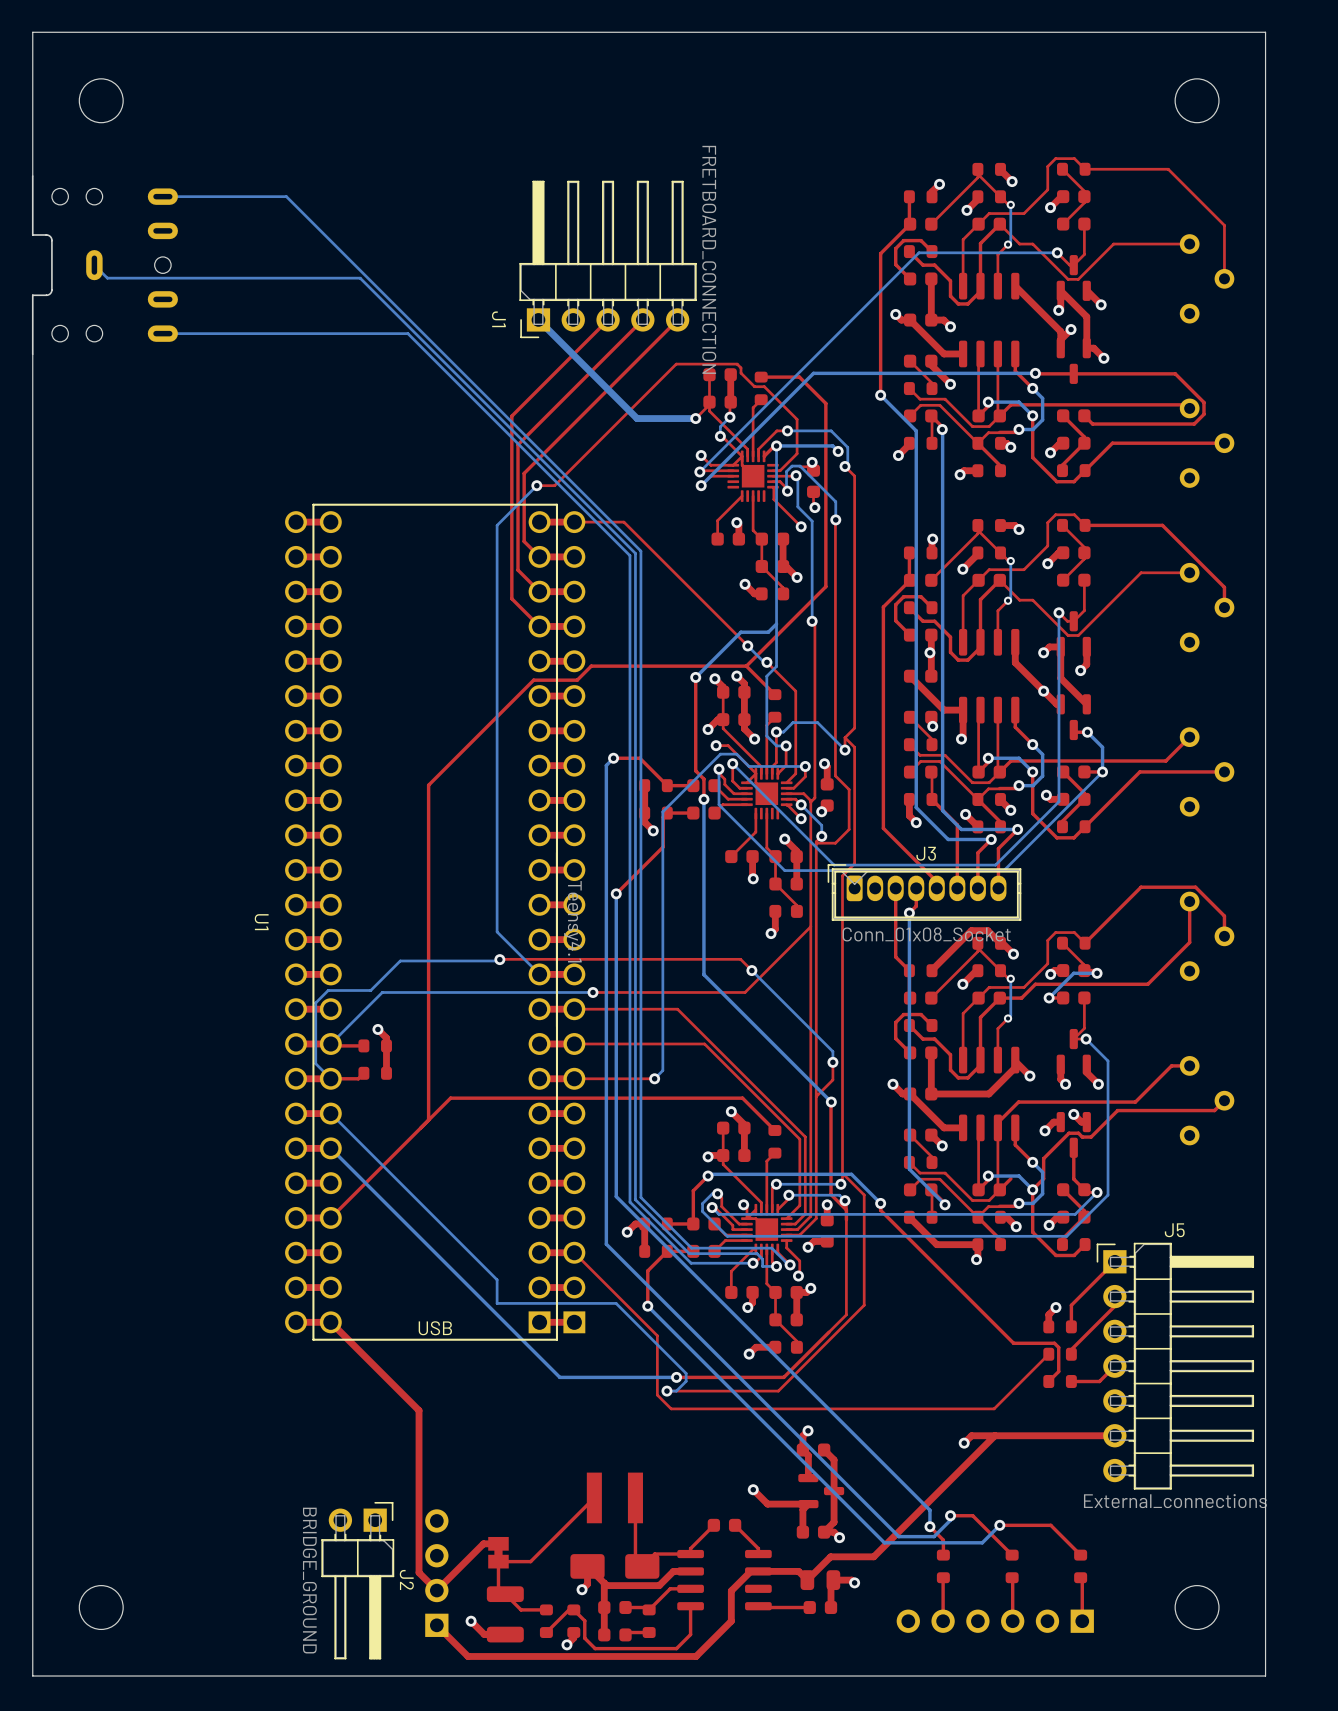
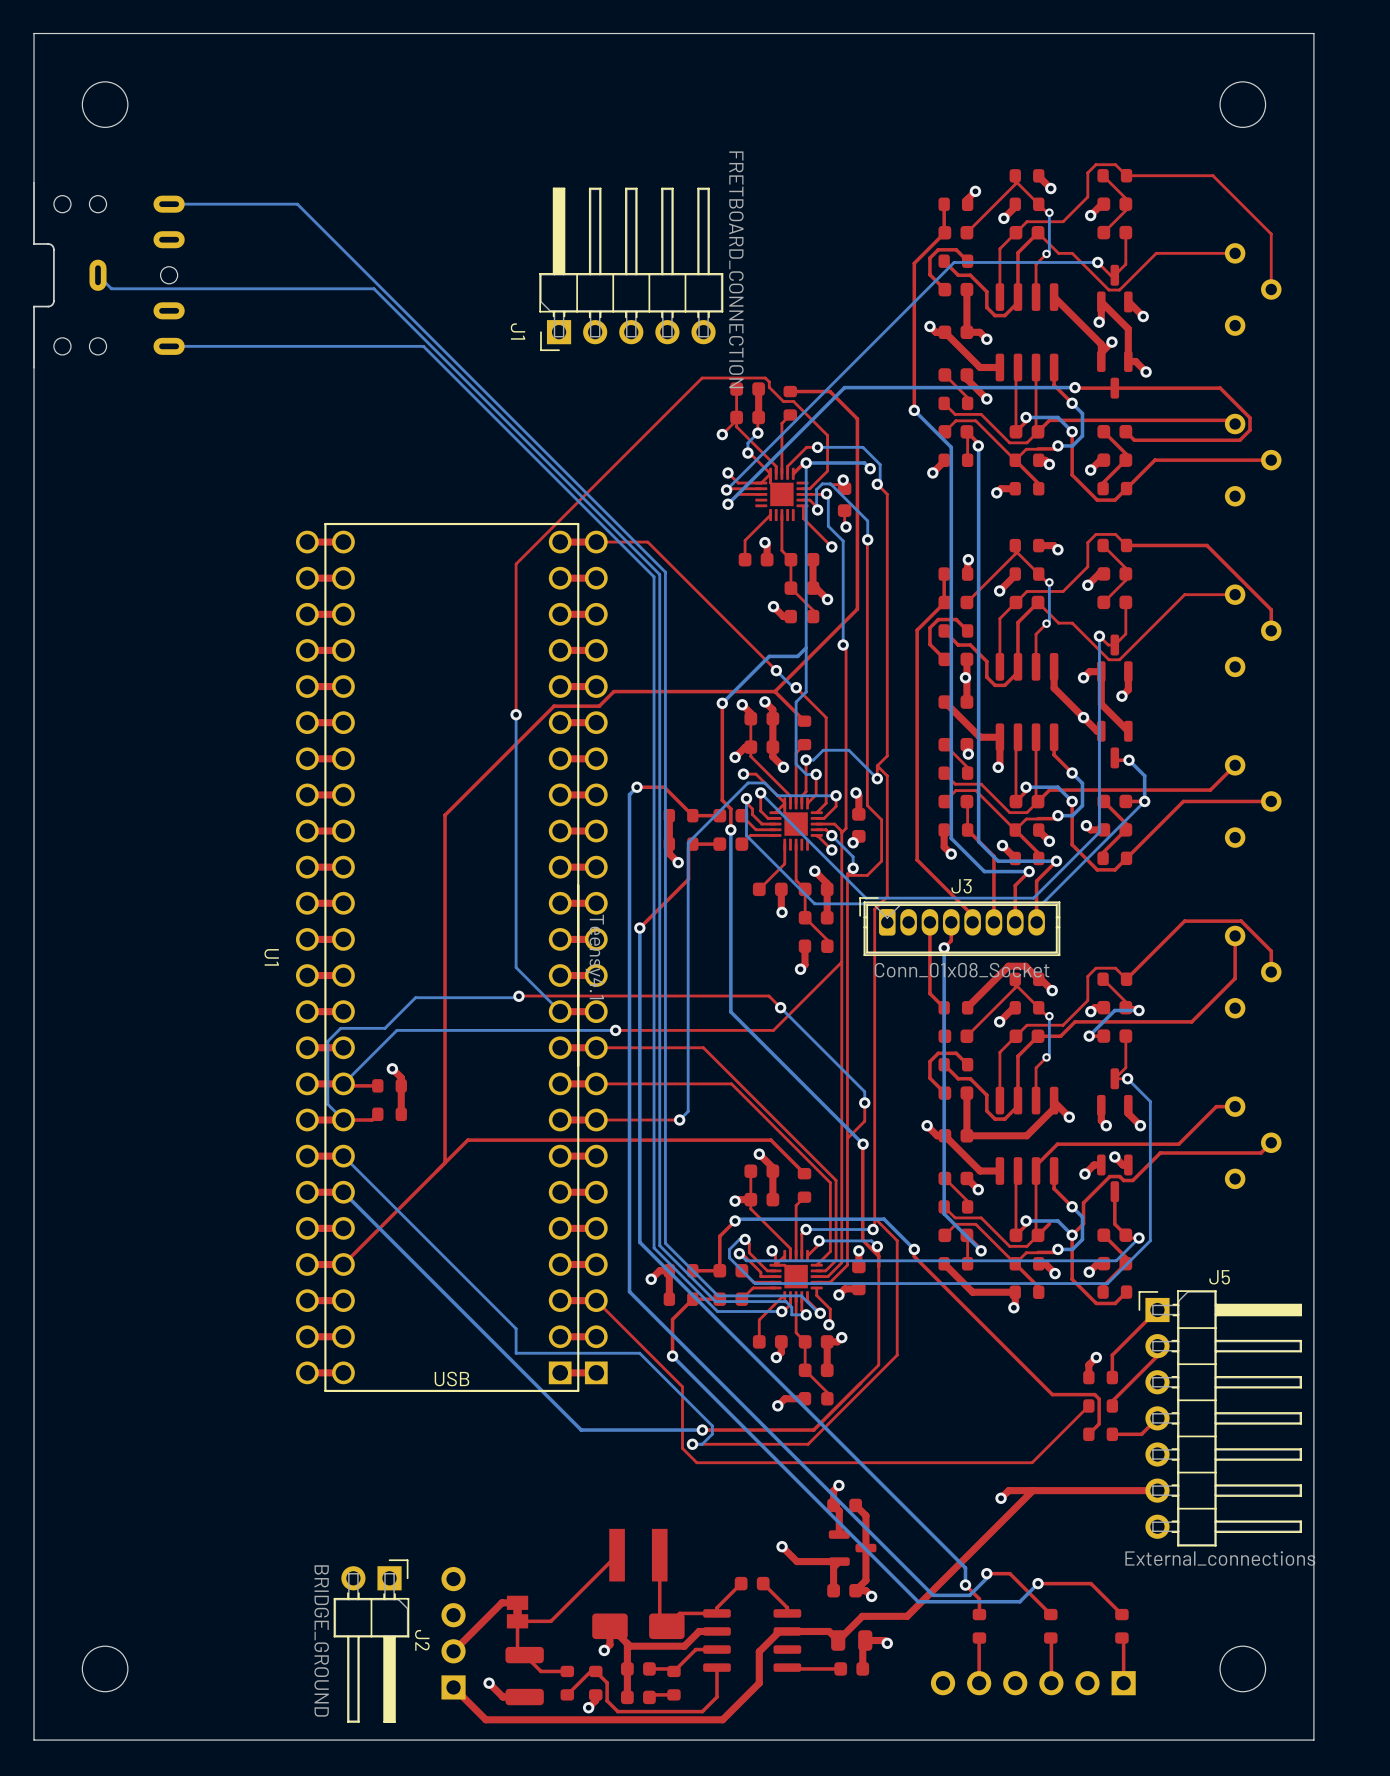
bottom track: (538, 319) (637, 418) (695, 418) -> none
top track: (608, 319) (511, 416) (511, 598) (539, 626) -> none
top track: (642, 319) (518, 444) (518, 570) (539, 591) -> none
top track: (677, 319) (524, 473) (524, 541) (539, 556) -> none
bottom track: (536, 485) (497, 525) (497, 688) -> none
via: (536, 485) -> none
top track: (554, 485) (536, 485) -> (575, 504) (516, 564) (516, 714)
via: none -> (516, 714)
top track: (330, 1322) (419, 1410) (419, 1572) (436, 1590) -> none

